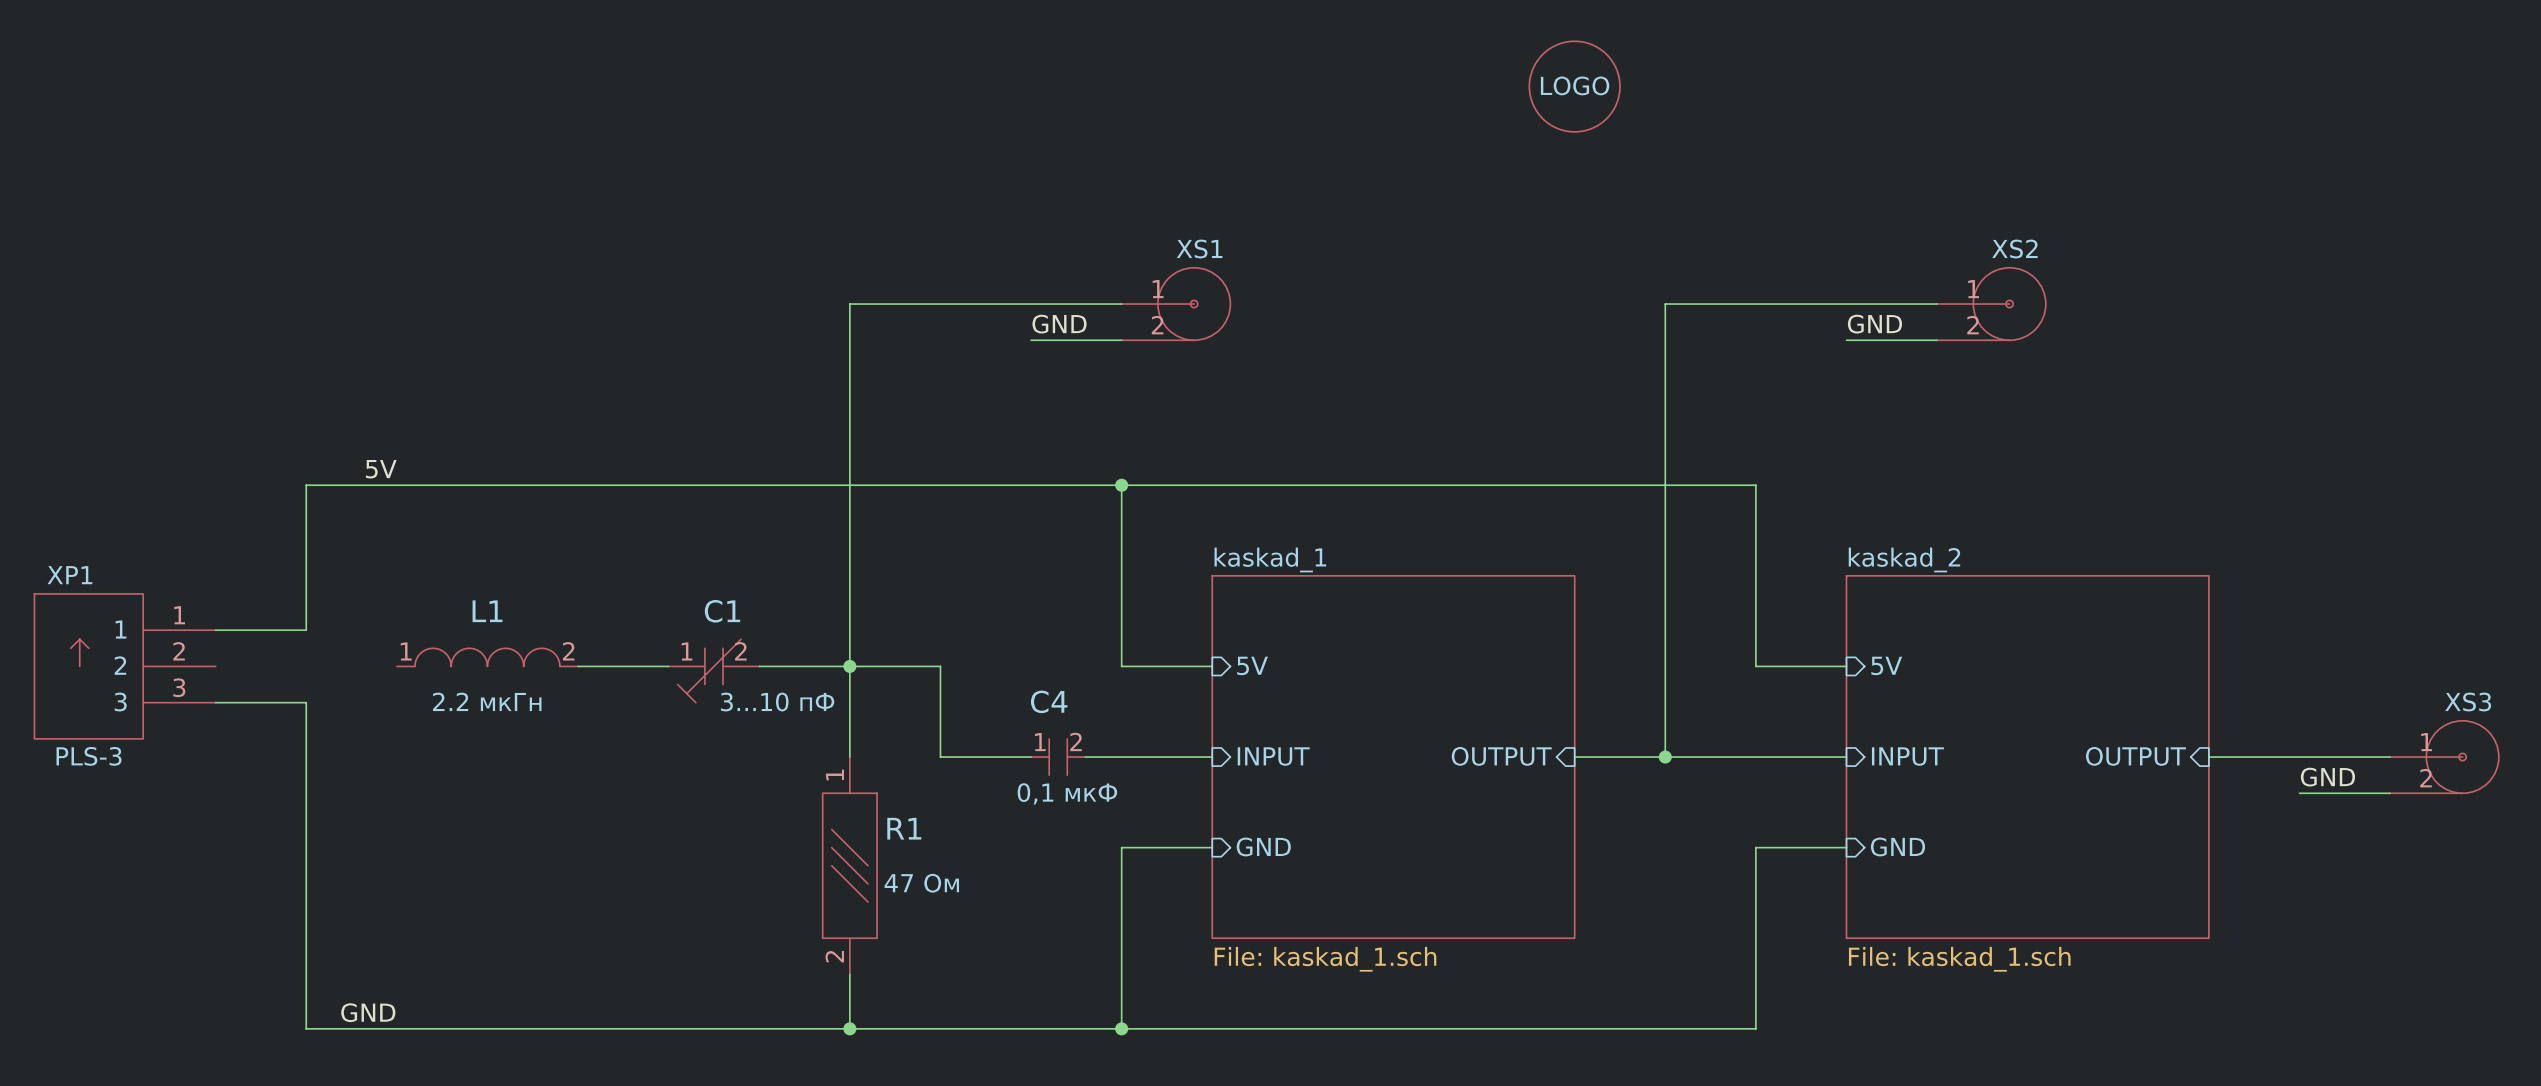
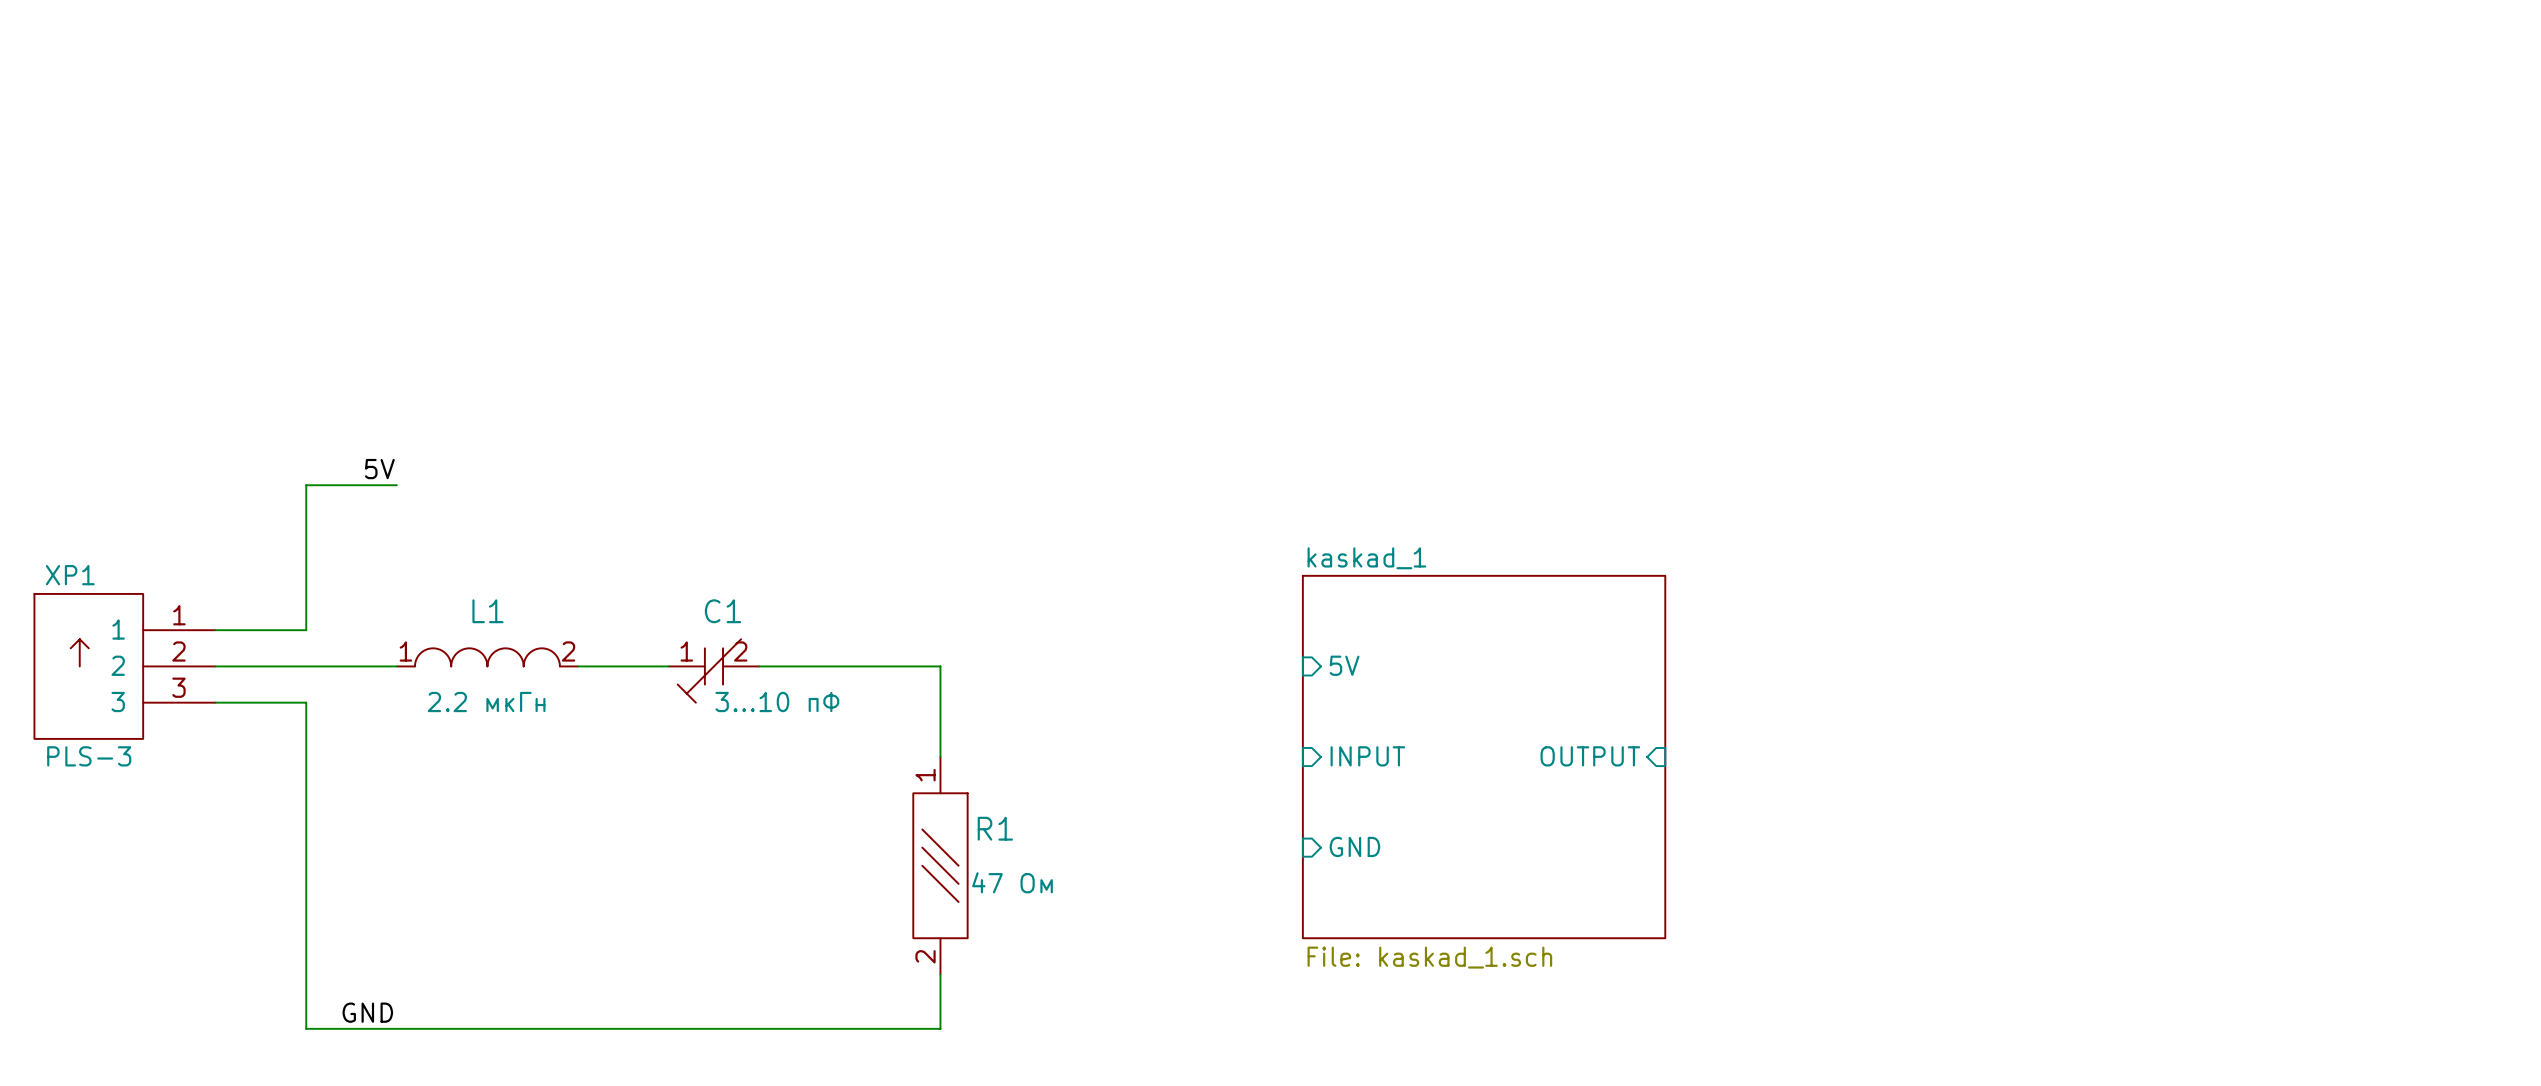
part: LOGO (1574, 86) -> none
wire: (1121, 304) (849, 304) (849, 757) -> none
XS1: (1176, 304) -> none
wire: (1937, 304) (1665, 304) (1665, 757) -> none
XS2: (1991, 304) -> none
label: GND (1059, 324) -> none
label: GND (1874, 324) -> none
wire: (1031, 340) (1121, 340) -> none
wire: (1846, 340) (1937, 340) -> none
wire: (396, 485) (1755, 485) (1755, 666) (1846, 666) -> none
wire: (1121, 485) (1121, 666) (1212, 666) -> none
junction: (1121, 485) -> none
sheet pin position: 5V (1252, 665) -> 5V (1344, 665)
sheet pin: 5V (1886, 665) -> none
wire: none -> (215, 666) (396, 666)
junction: (849, 666) -> none
sheet pin position: INPUT (1273, 756) -> INPUT (1367, 756)
sheet pin position: OUTPUT (1501, 756) -> OUTPUT (1590, 756)
sheet pin: INPUT (1907, 756) -> none
sheet pin: OUTPUT (2135, 756) -> none
wire: (940, 757) (1031, 757) -> none
C4: (1058, 757) -> none
wire: (1085, 757) (1212, 757) -> none
sheet kaskad_1 position: (1393, 757) -> (1484, 757)
wire: (1574, 757) (1846, 757) -> none
junction: (1665, 757) -> none
sheet kaskad_2: File: kaskad_1.sch (2027, 757) -> none
wire: (2208, 757) (2390, 757) -> none
XS3: (2444, 757) -> none
label: GND (2327, 777) -> none
wire: (2299, 793) (2390, 793) -> none
sheet pin position: GND (1263, 846) -> GND (1354, 846)
sheet pin: GND (1897, 846) -> none
wire: (1212, 847) (1121, 847) (1121, 1028) -> none
wire: (1846, 847) (1755, 847) (1755, 1028) (940, 1028) -> (940, 974) (940, 1028)
R1 position: (849, 865) -> (940, 865)
wire: (849, 974) (849, 1028) -> none
junction: (849, 1028) -> none
junction: (1121, 1028) -> none

